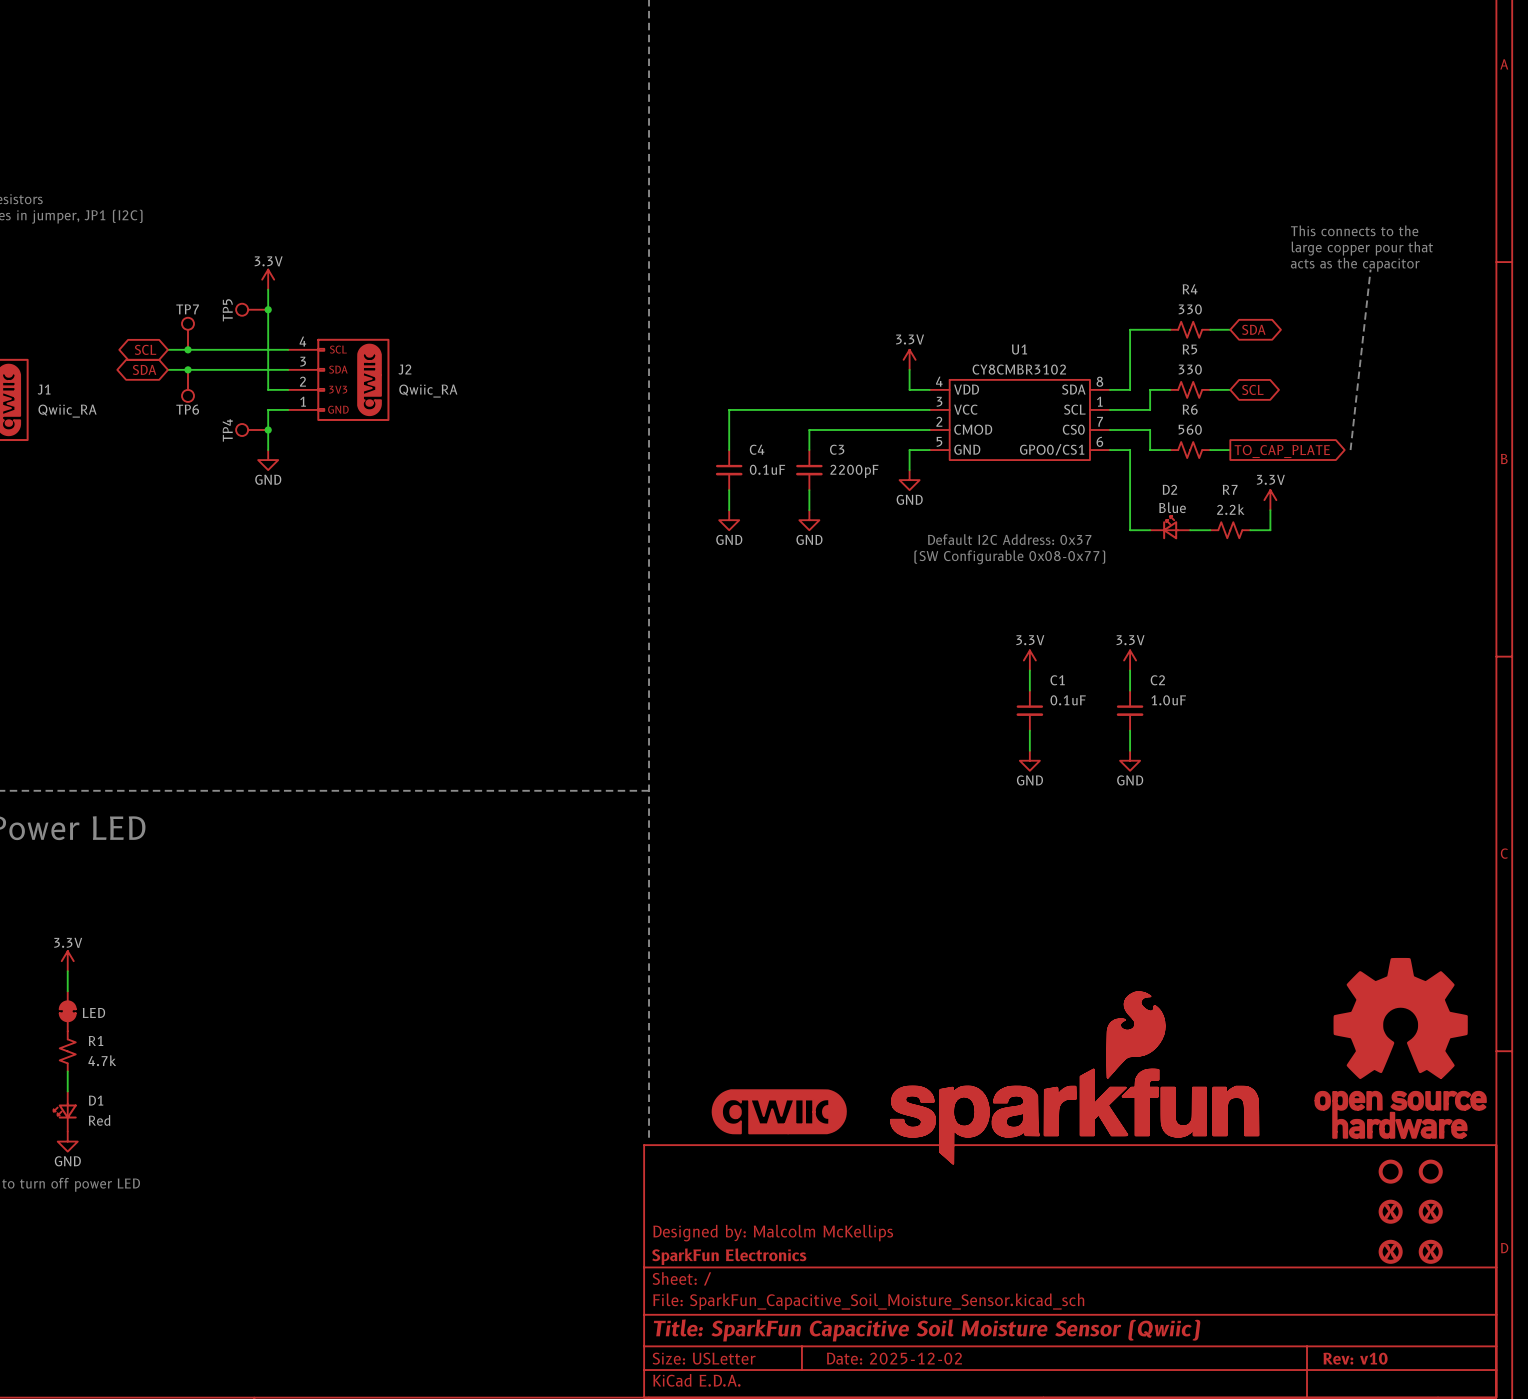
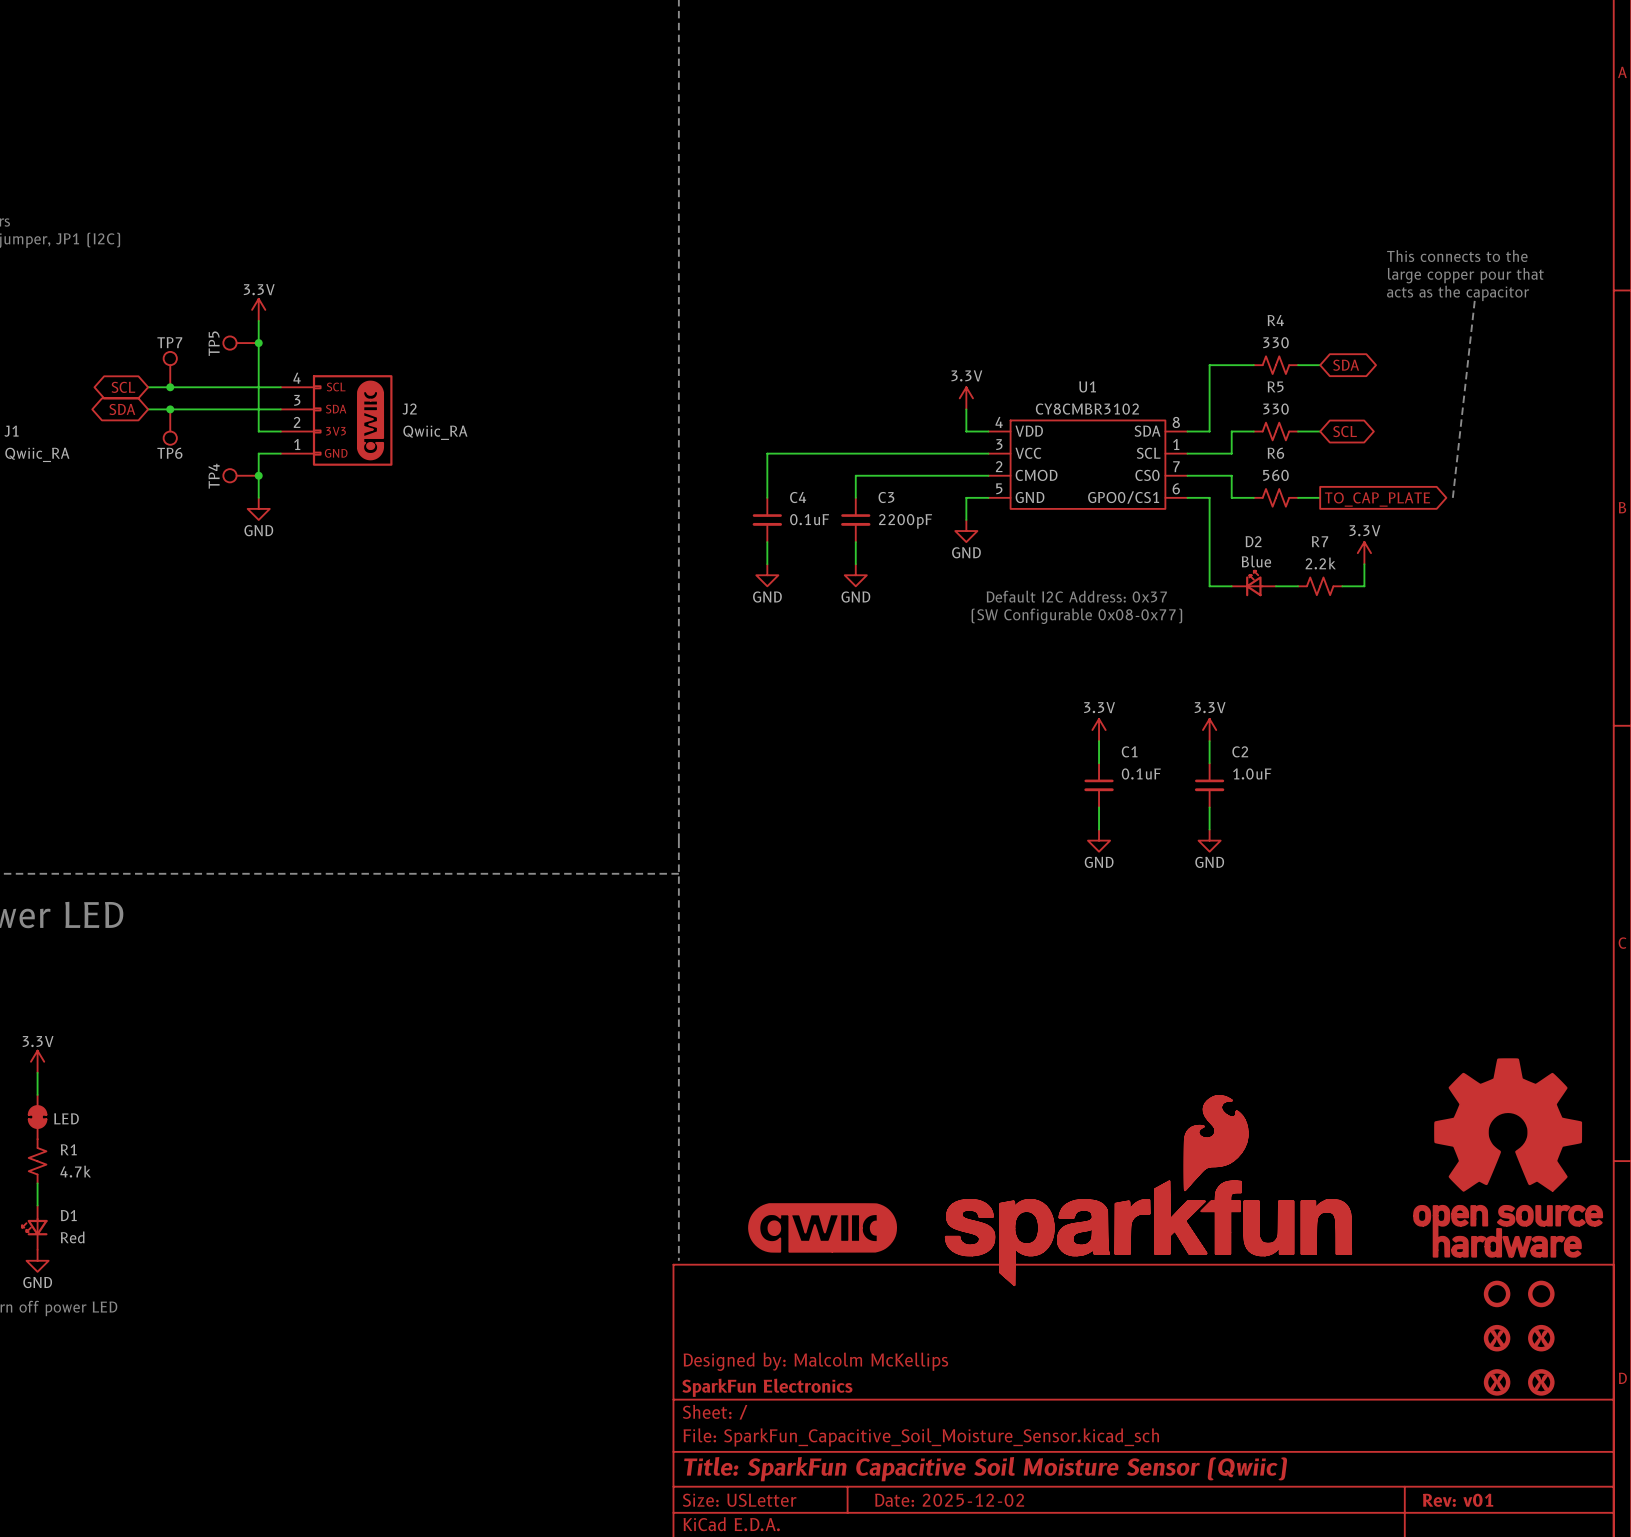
title block: Rev: v10 (1355, 1358) -> Rev: v01 (1458, 1500)

